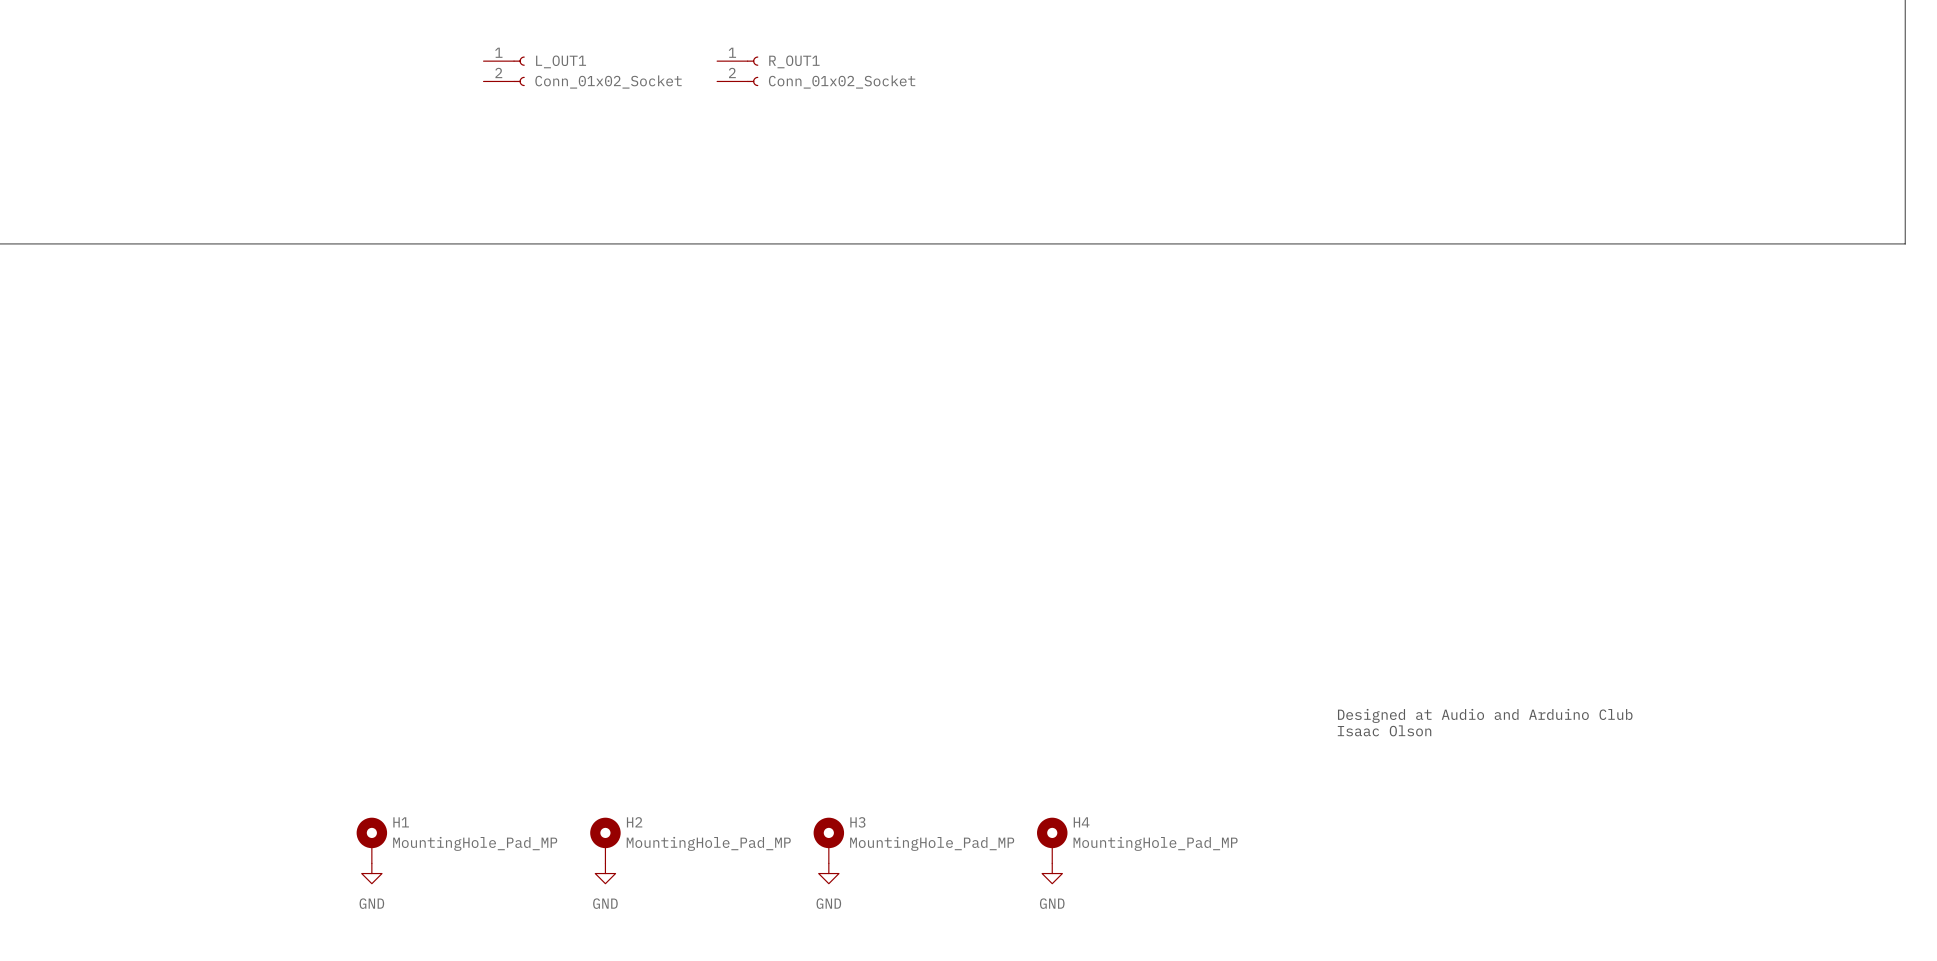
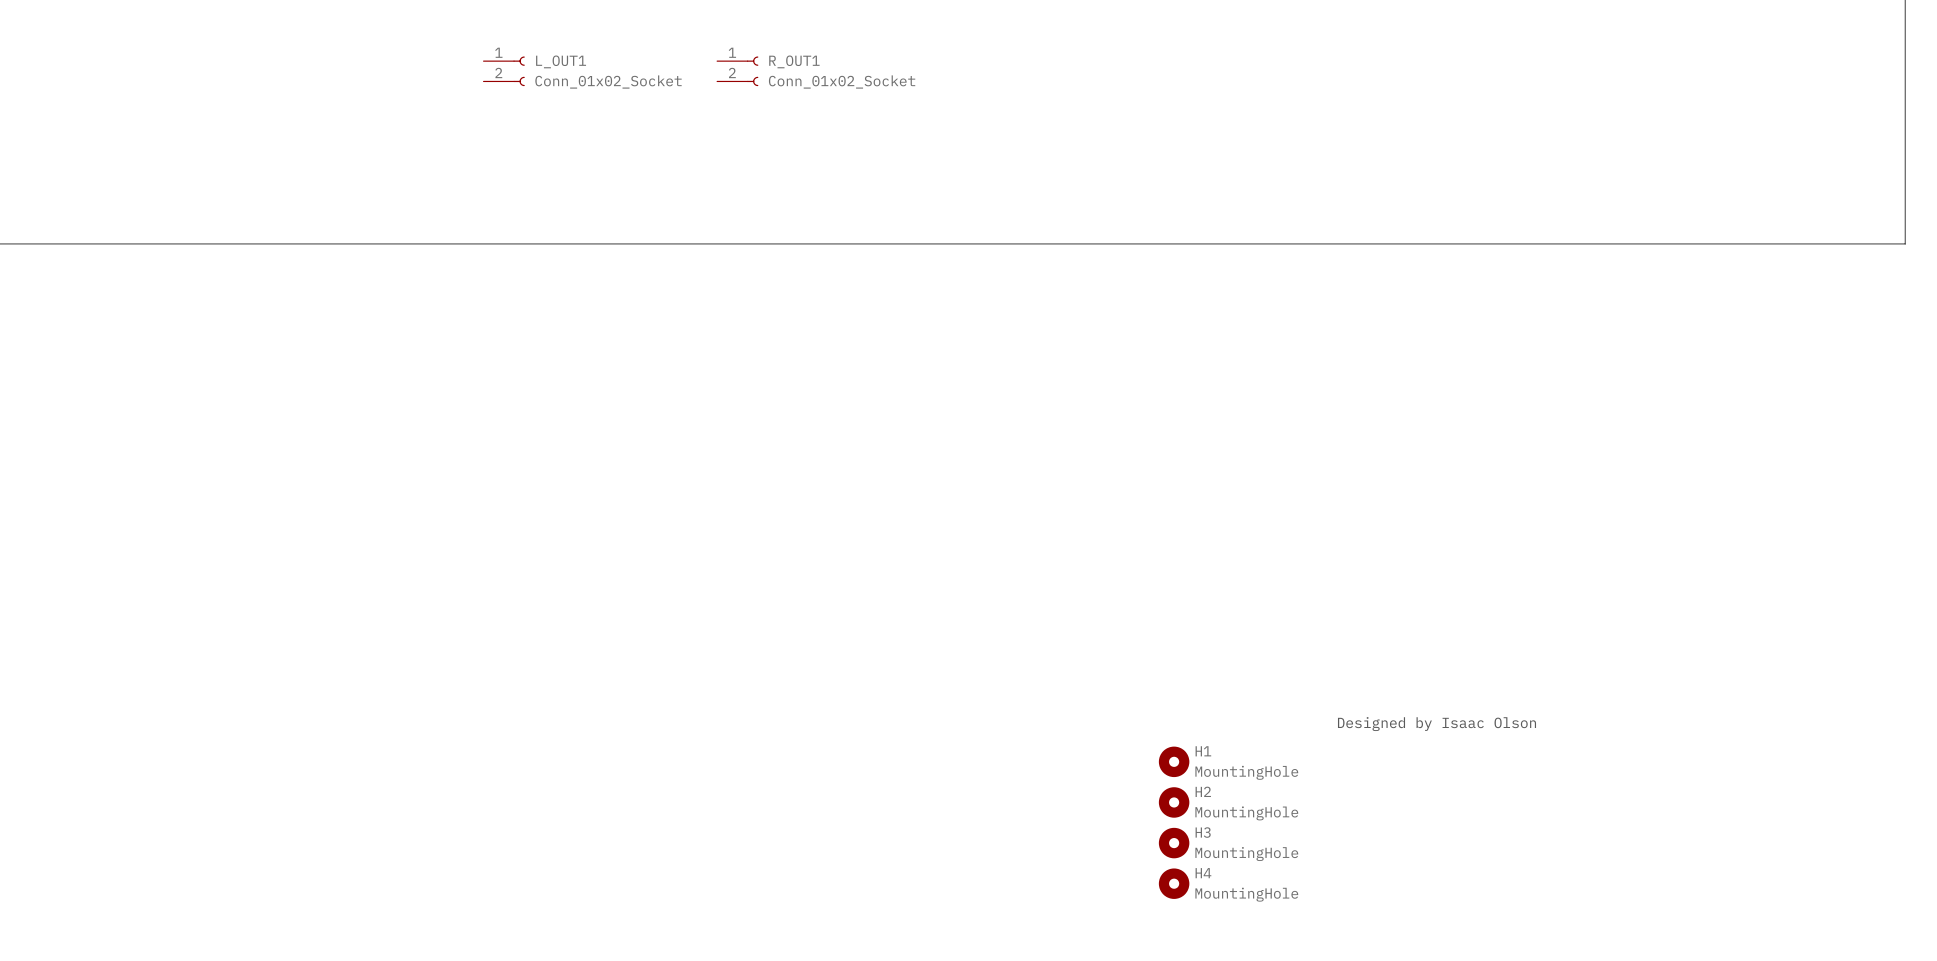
text: Designed at Audio and Arduino Club (1485, 715) -> none
text: Isaac Olson (1384, 730) -> Designed by Isaac Olson (1437, 724)
H1 symbol: [356, 817, 388, 864] -> [1158, 746, 1190, 778]
H2 symbol: [590, 817, 621, 864] -> [1158, 787, 1190, 818]
H3 symbol: [813, 817, 845, 864] -> [1158, 827, 1190, 859]
H4 symbol: [1037, 817, 1068, 864] -> [1158, 868, 1190, 899]
H1 value: MountingHole_Pad_MP (475, 843) -> MountingHole (1246, 772)
H2 value: MountingHole_Pad_MP (708, 843) -> MountingHole (1246, 813)
H3 value: MountingHole_Pad_MP (932, 843) -> MountingHole (1246, 854)
H4 value: MountingHole_Pad_MP (1155, 843) -> MountingHole (1246, 894)
power symbol: GND (371, 873) -> none
power symbol: GND (605, 873) -> none
power symbol: GND (828, 873) -> none
power symbol: GND (1052, 873) -> none

